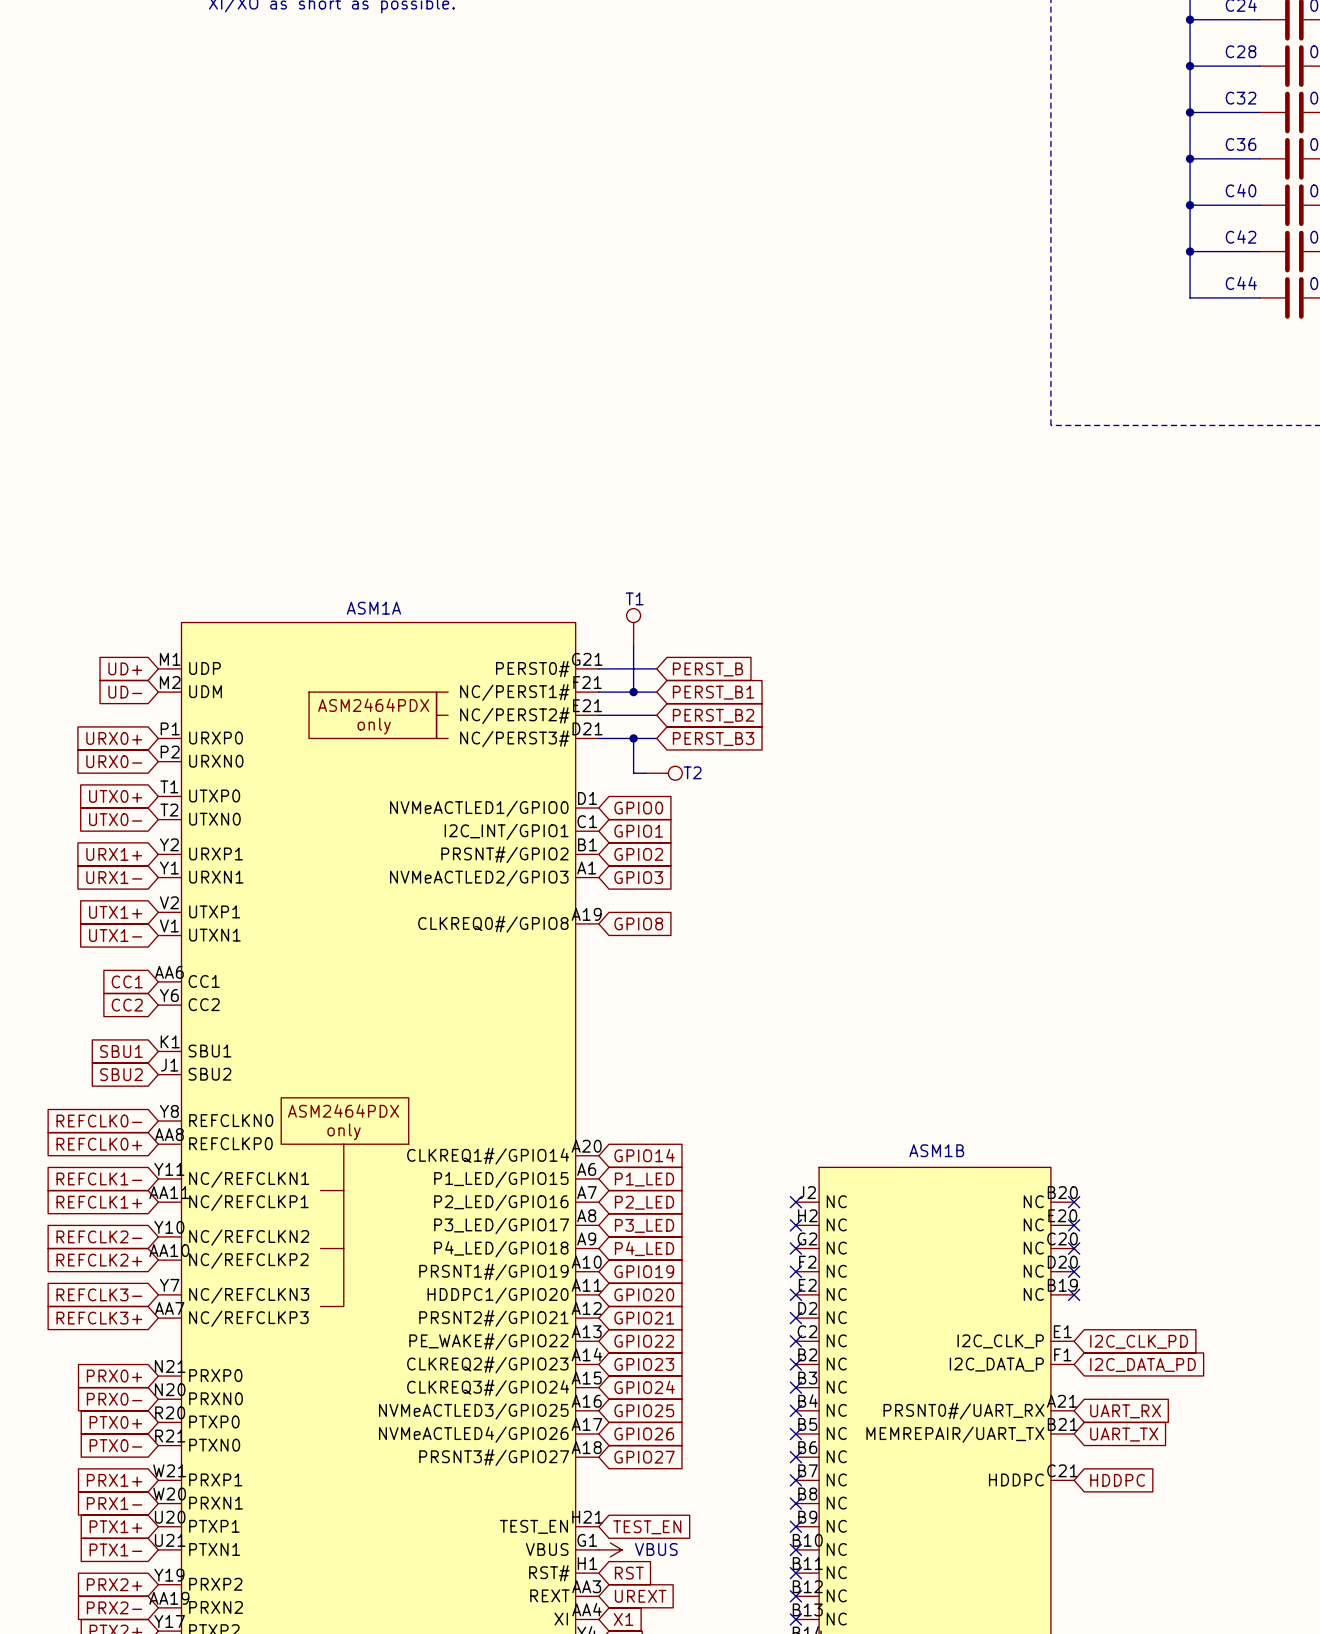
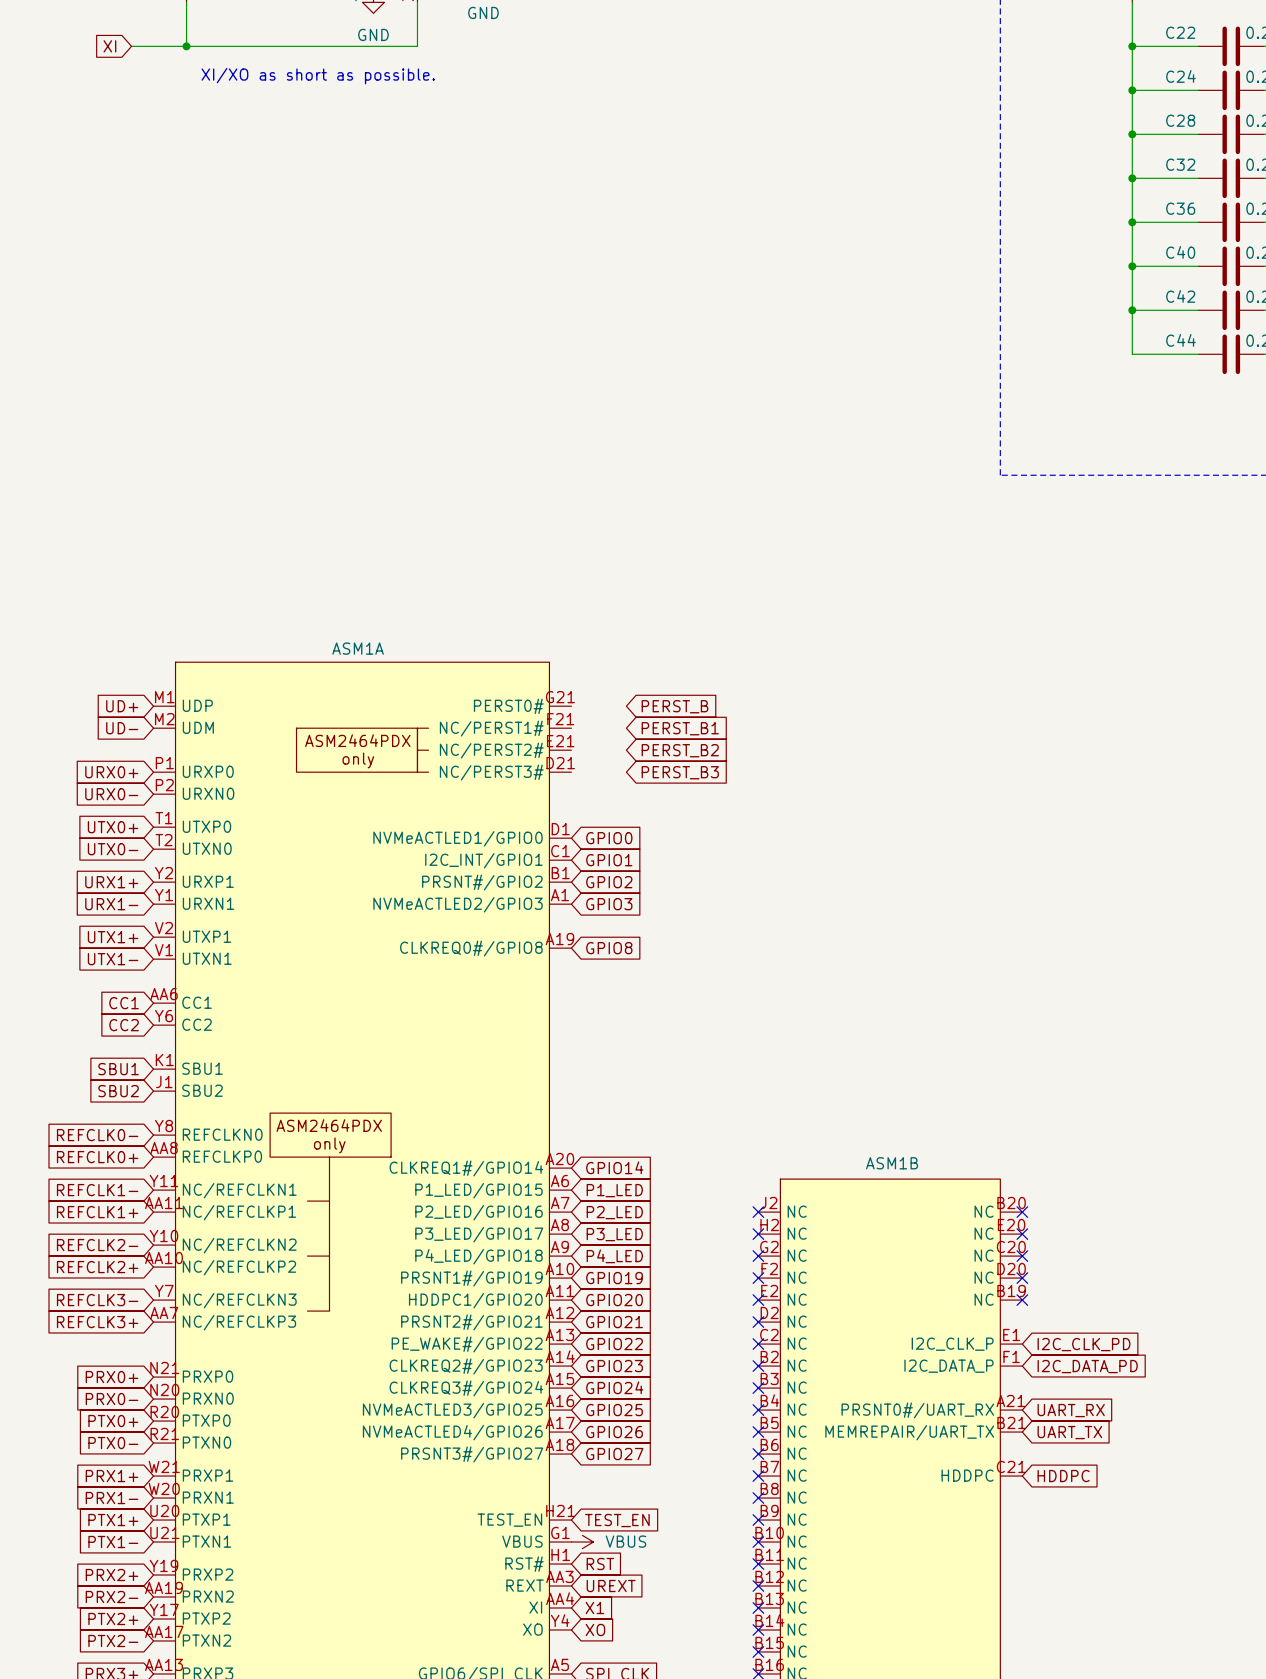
T1: (633, 627) -> none
wire: (633, 645) (633, 692) -> none
wire: (598, 668) (656, 668) -> none
wire: (598, 692) (656, 692) -> none
junction: (633, 692) -> none
wire: (598, 715) (656, 715) -> none
wire: (598, 738) (656, 738) -> none
wire: (633, 738) (633, 773) (645, 773) -> none
junction: (633, 738) -> none
T2: (663, 773) -> none

